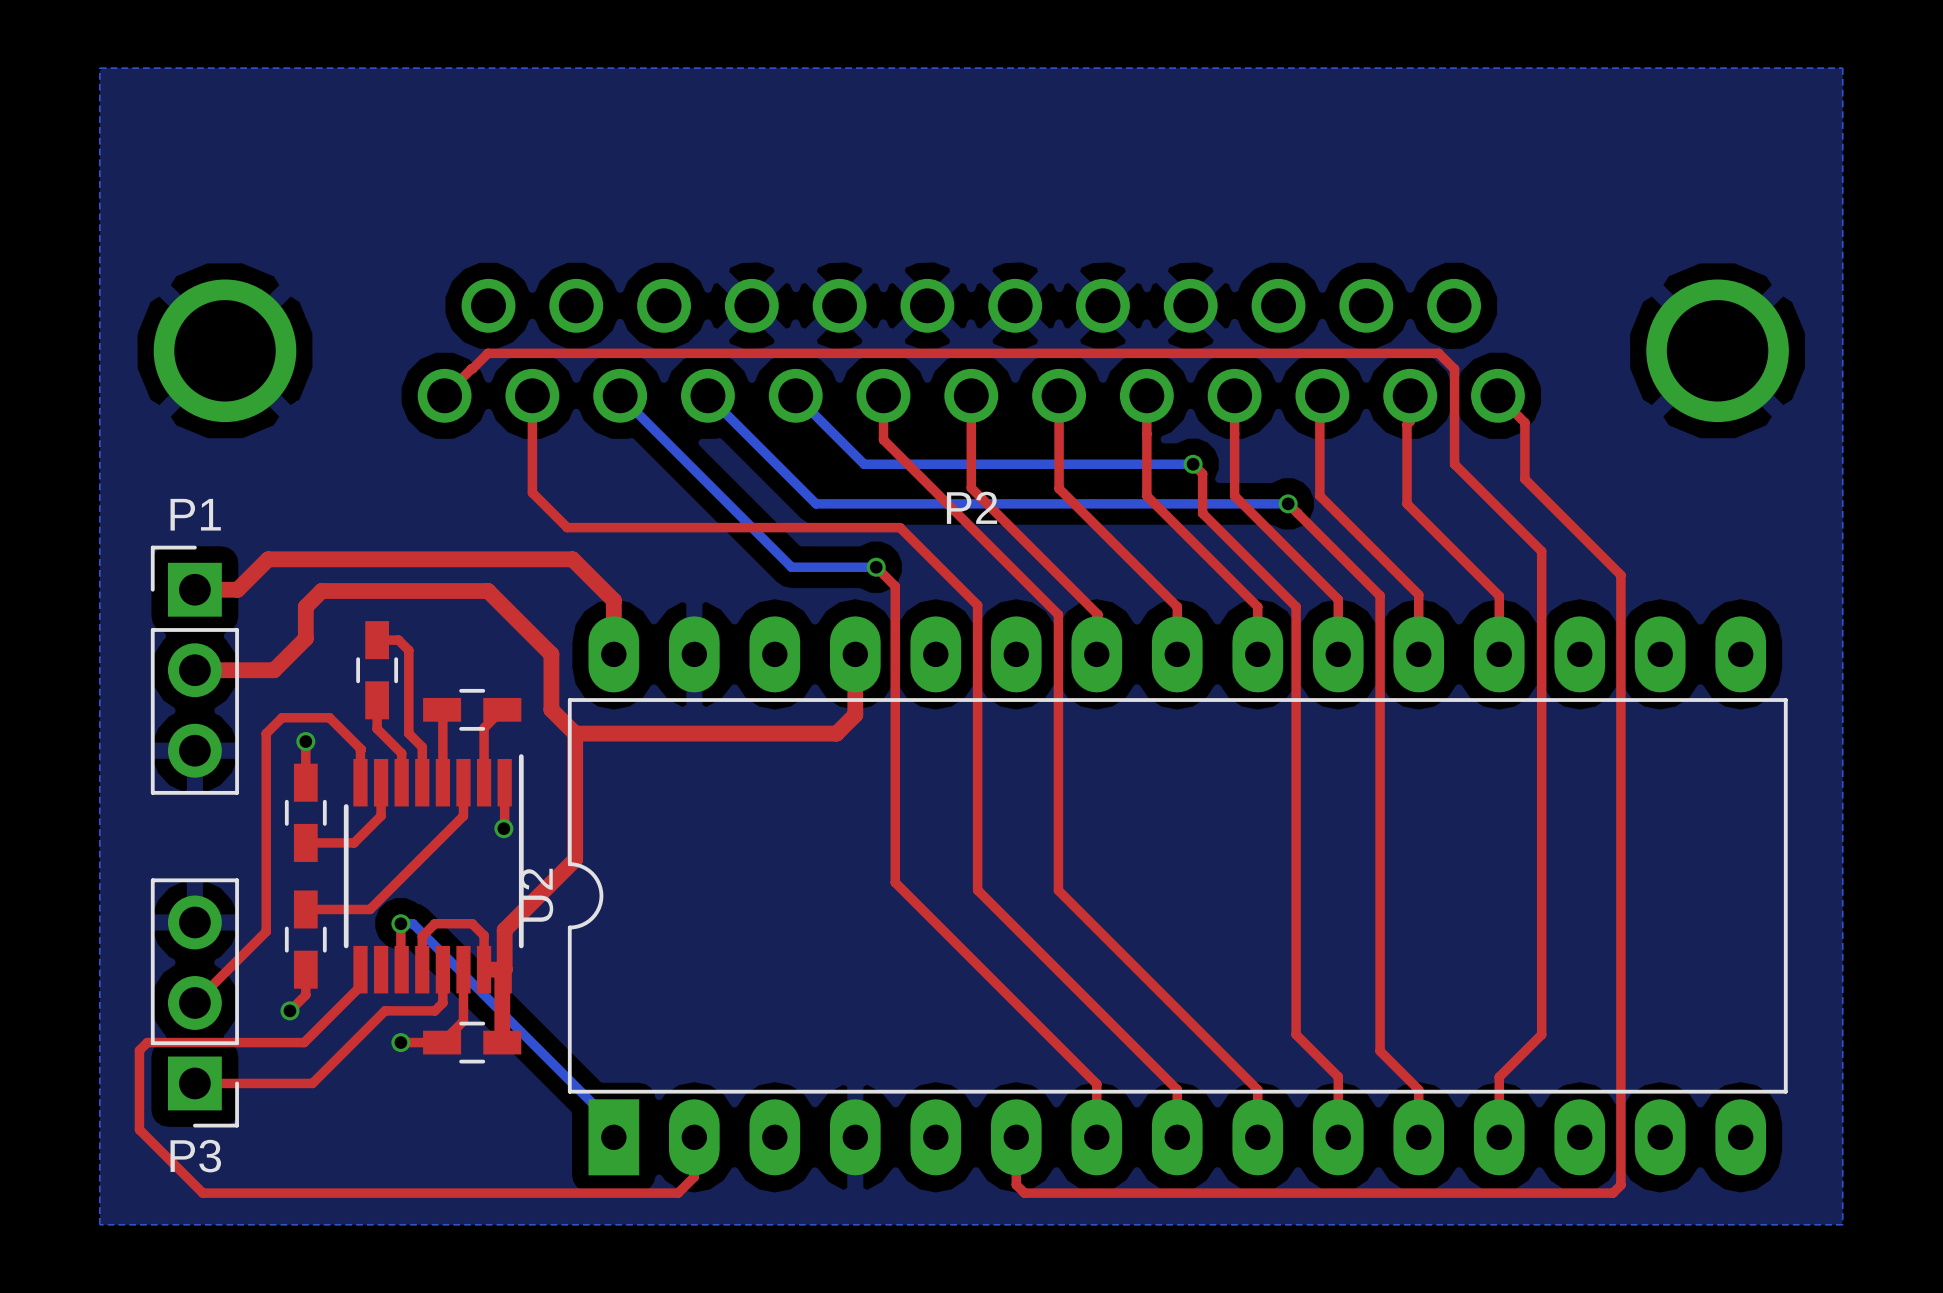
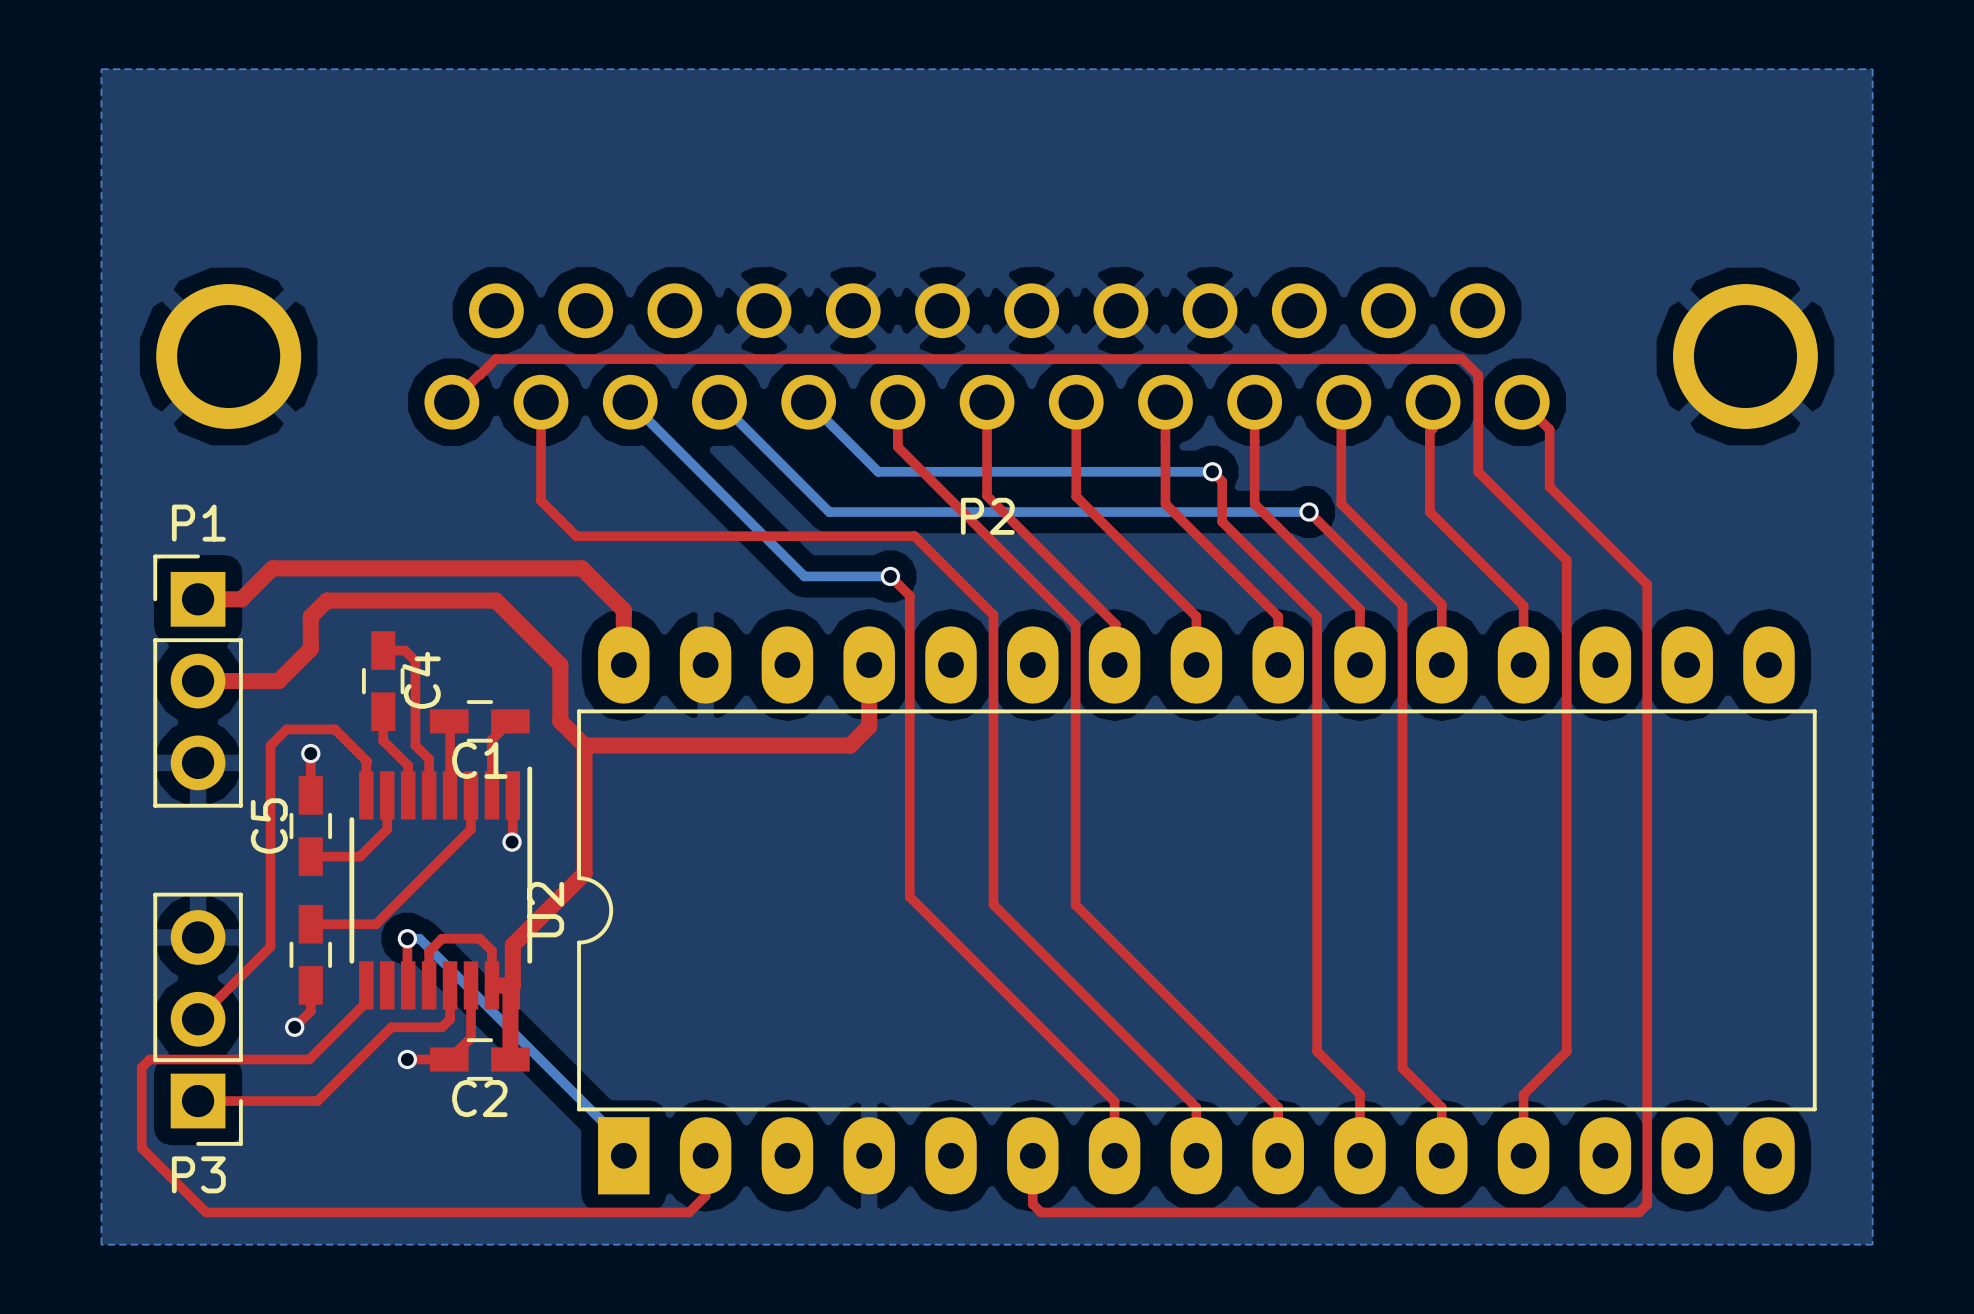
C4 name: none -> C4 (421, 680)
C1 name: none -> C1 (479, 760)
C5 name: none -> C5 (269, 826)
C2 name: none -> C2 (479, 1098)

